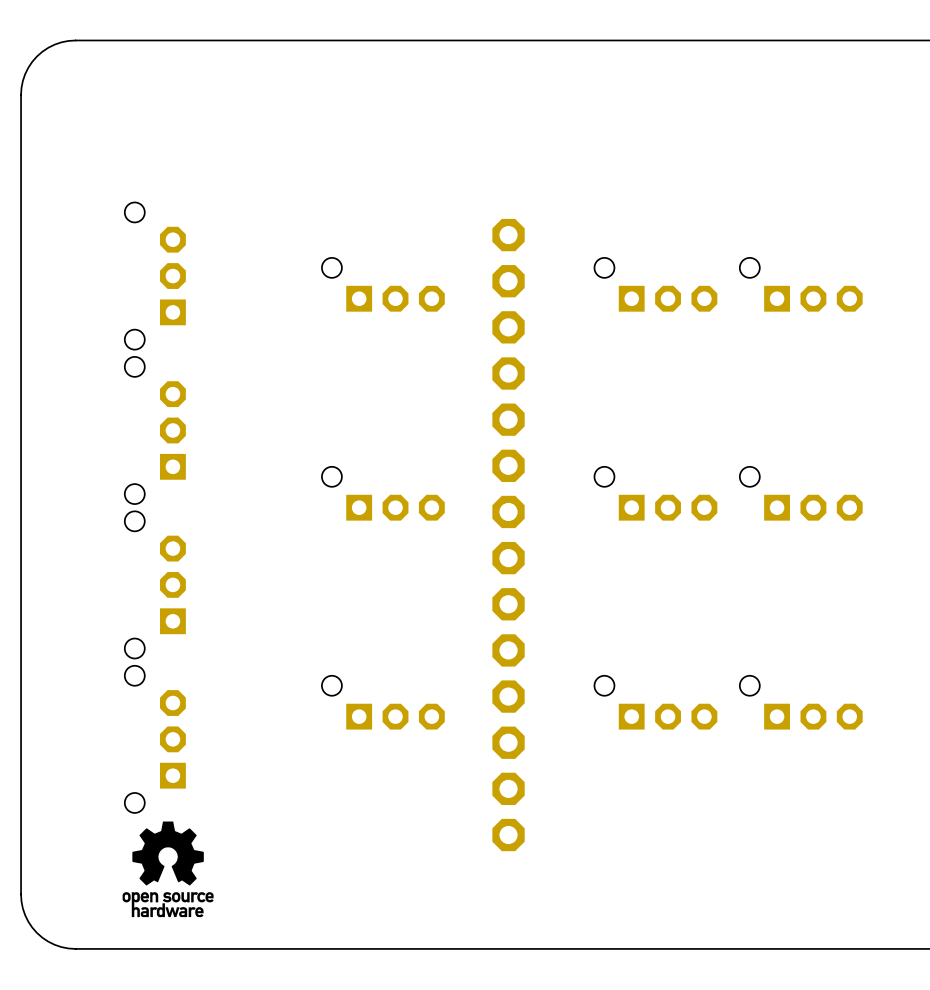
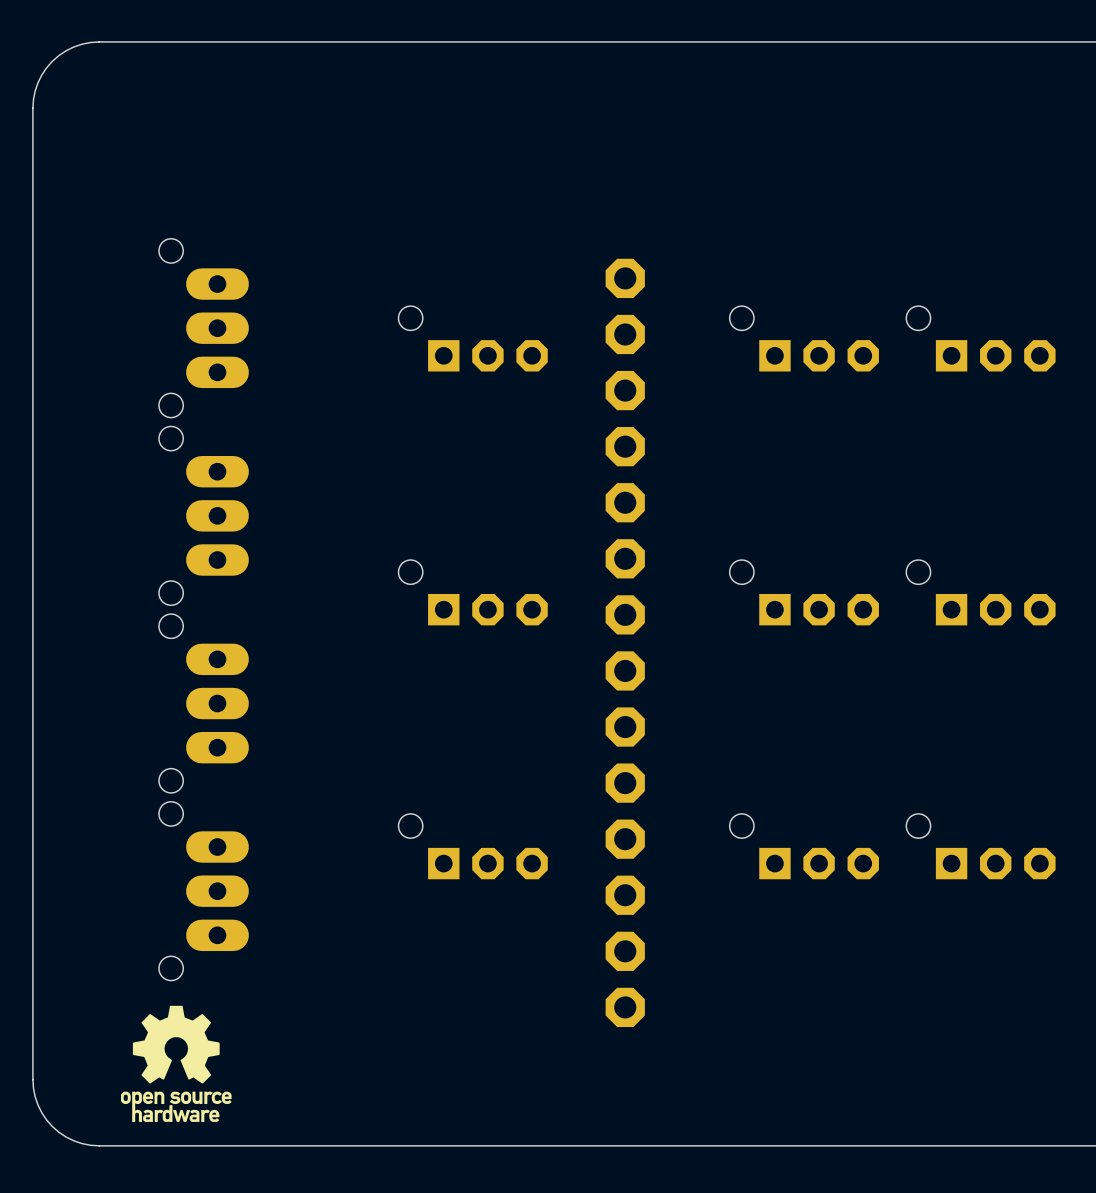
part footprint: [124, 202, 186, 350] -> [158, 238, 249, 418]
part footprint: [124, 356, 186, 505] -> [158, 426, 249, 606]
part footprint: [124, 511, 186, 659] -> [158, 614, 249, 793]
part footprint: [124, 665, 186, 813] -> [158, 801, 249, 981]
drawing position: (168, 869) -> (176, 1063)

